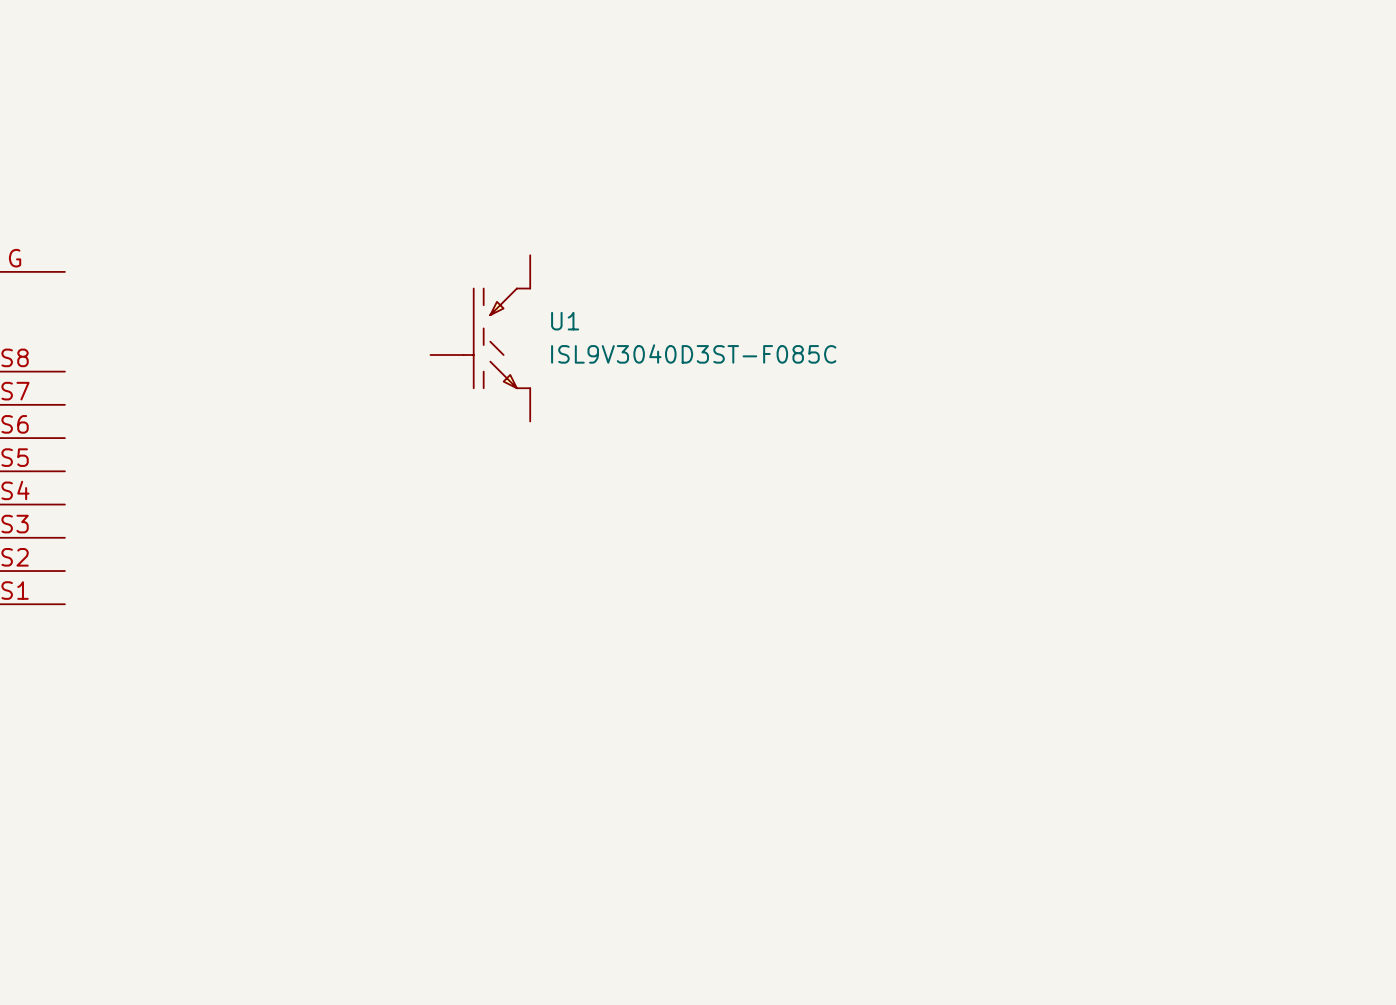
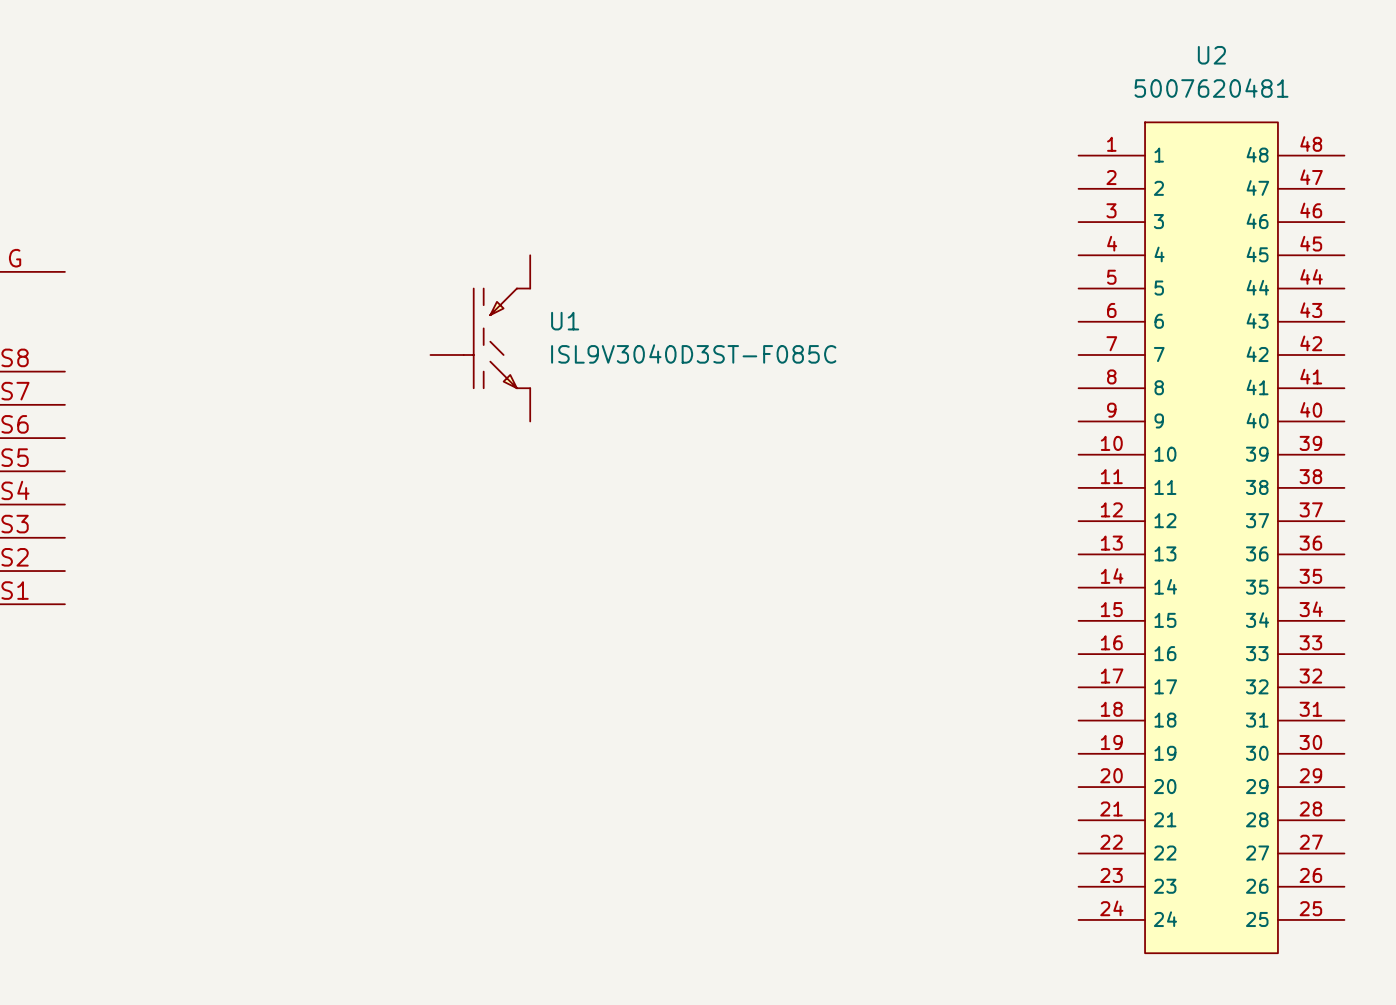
U2: none -> 5007620481 (1211, 537)

